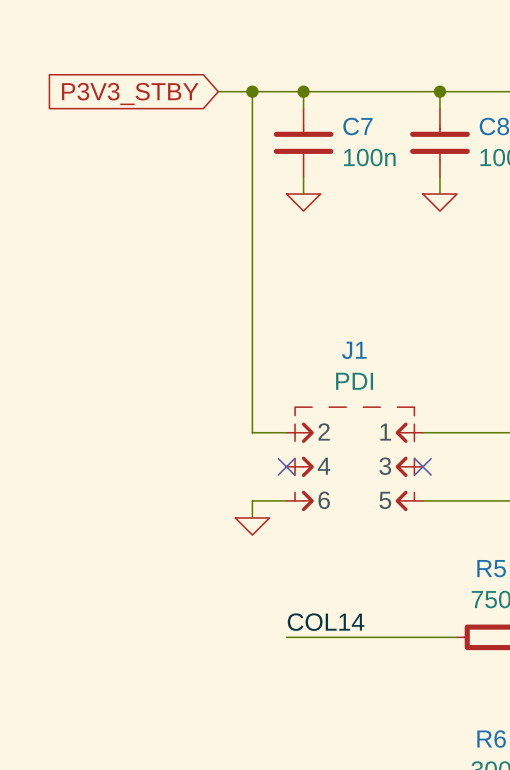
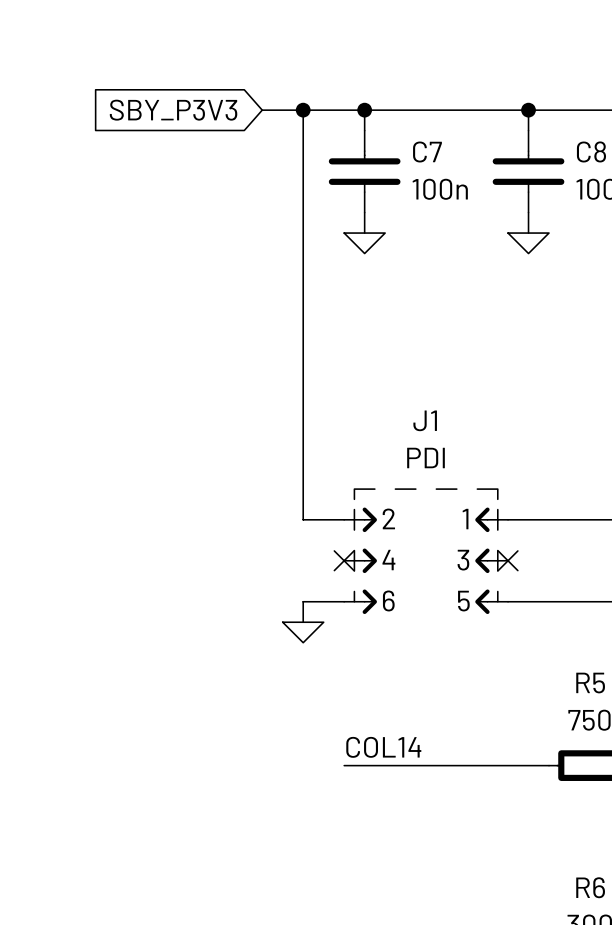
global label: P3V3_STBY (130, 94) -> SBY_P3V3 (173, 110)

